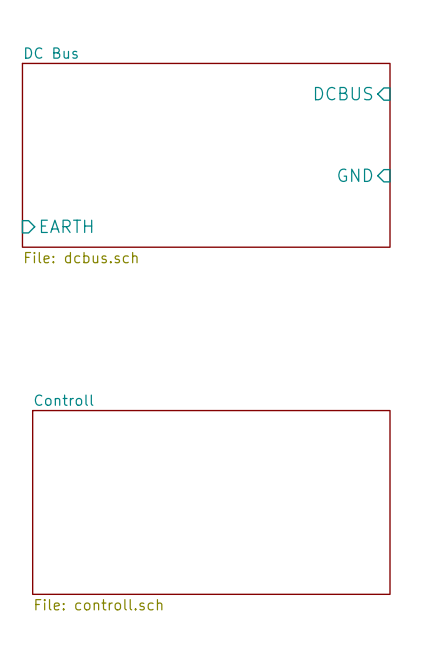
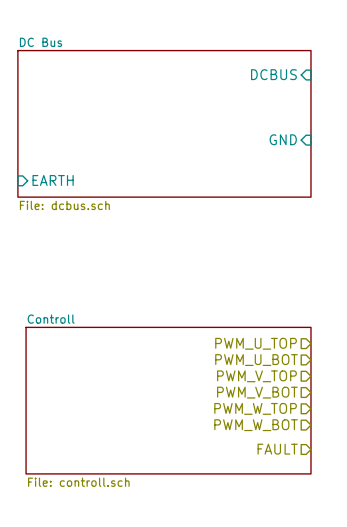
hierarchical label: none -> PWM_U_TOP (256, 343)
hierarchical label: none -> PWM_U_BOT (256, 360)
hierarchical label: none -> PWM_V_TOP (256, 376)
hierarchical label: none -> PWM_V_BOT (257, 392)
hierarchical label: none -> PWM_W_TOP (255, 408)
hierarchical label: none -> PWM_W_BOT (256, 425)
hierarchical label: none -> FAULT (277, 449)

